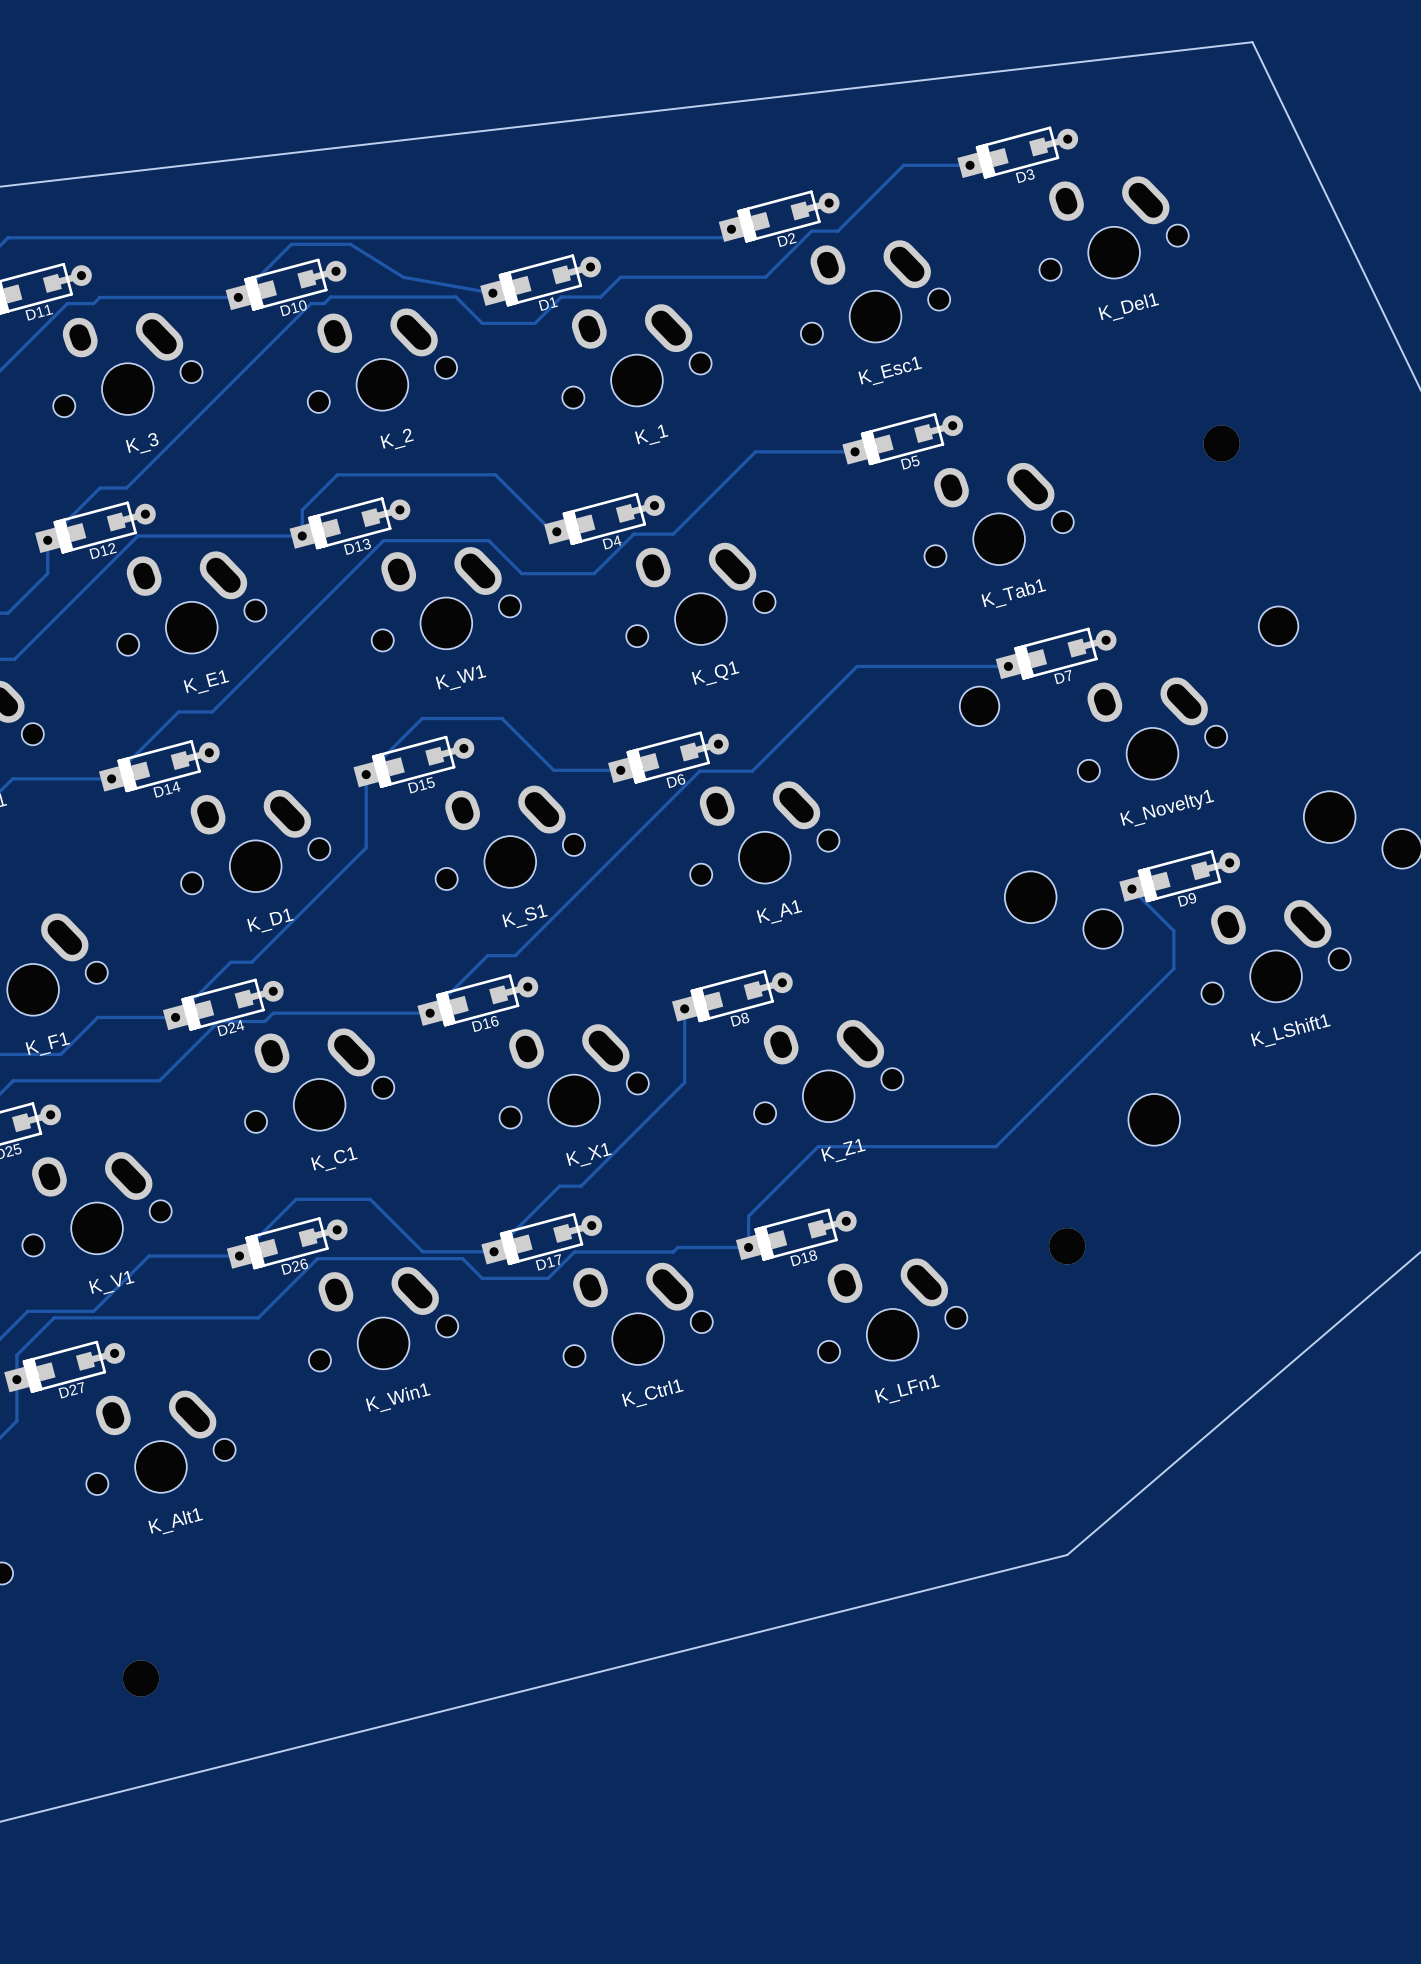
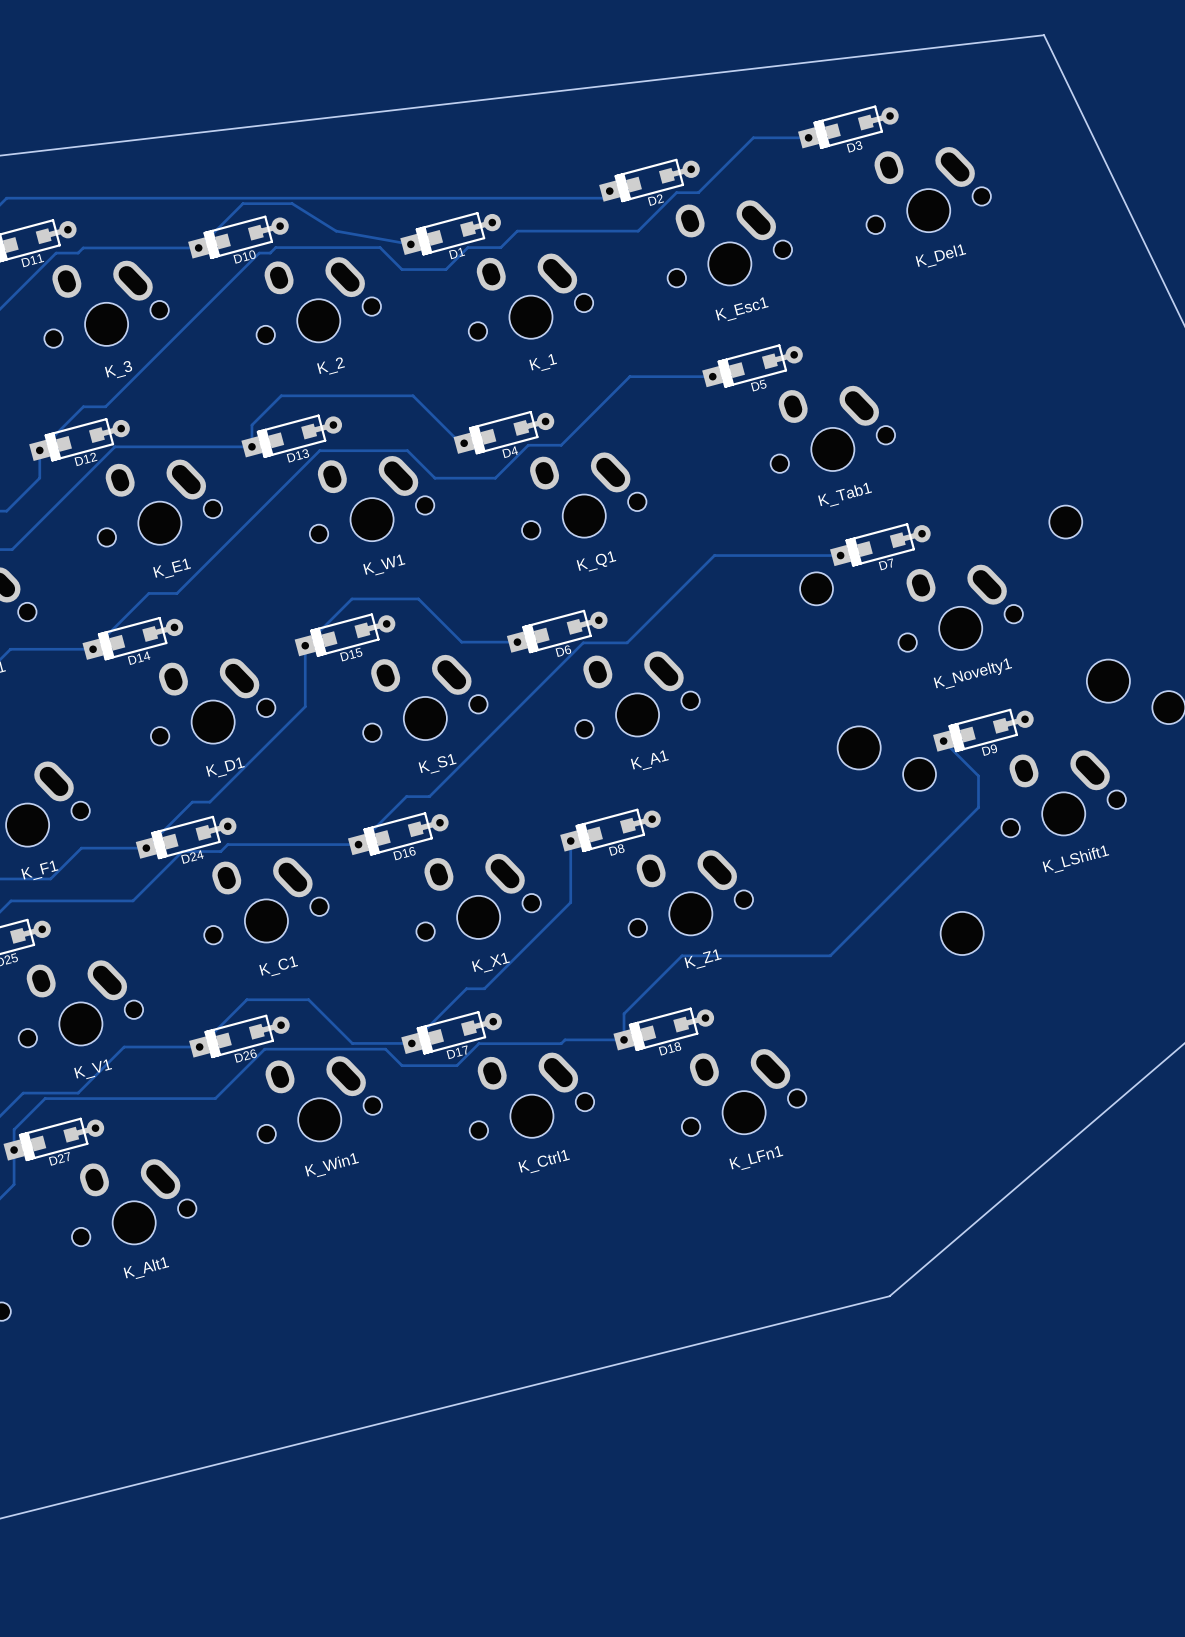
part: (1221, 443) -> none
part: (1067, 1246) -> none
part: (141, 1678) -> none

